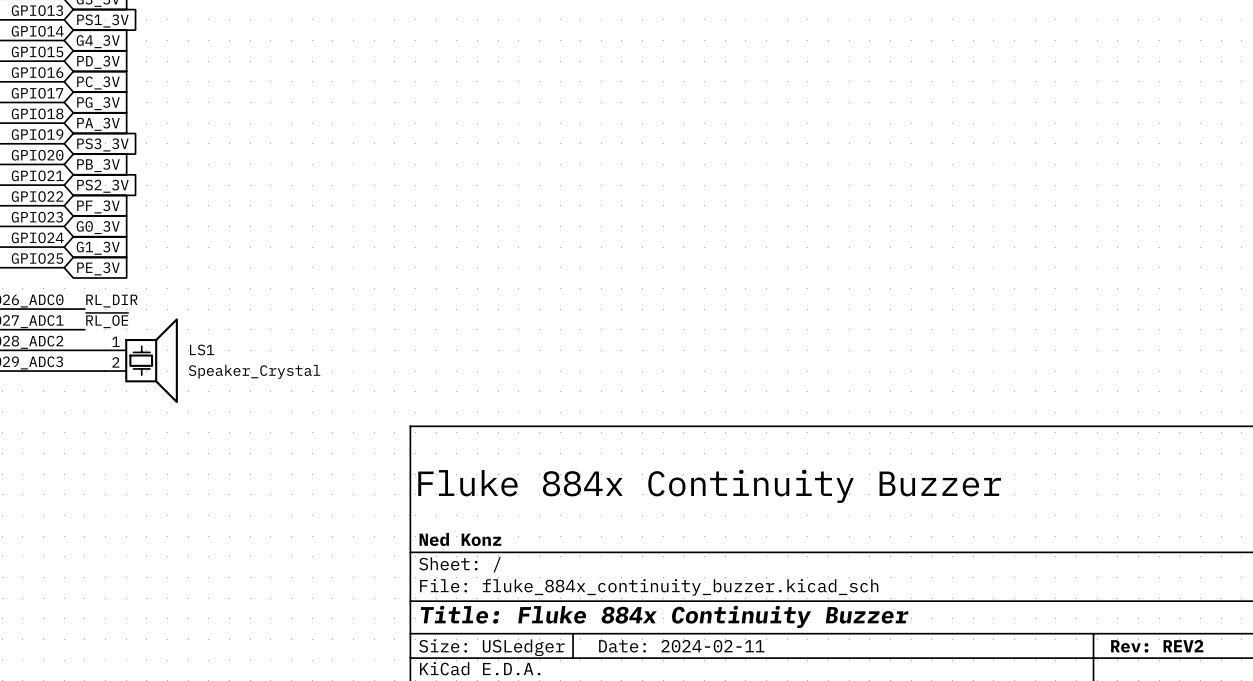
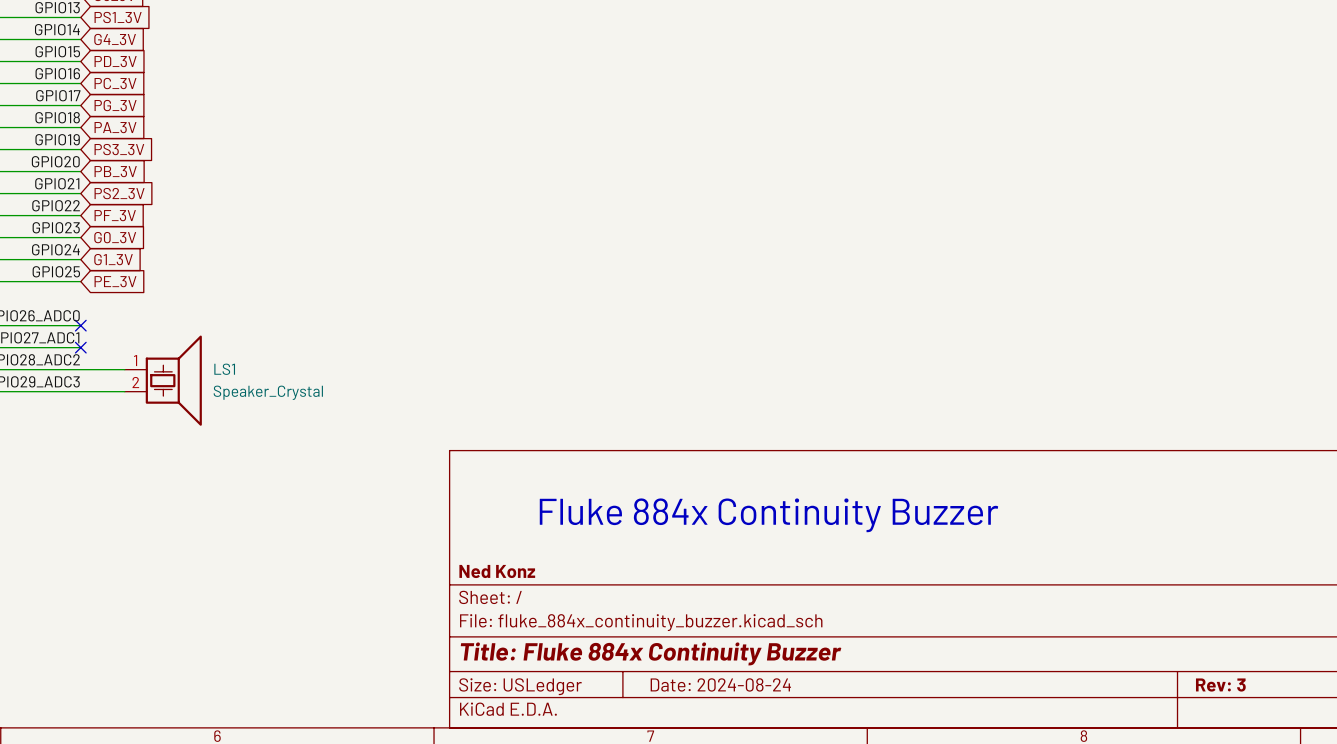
label: RL_DIR (111, 301) -> none
wire: (64, 309) (84, 309) -> none
no-connect mark: none -> (80, 325)
label: ~{RL_OE} (107, 320) -> none
wire: (64, 329) (84, 329) -> none
no-connect mark: none -> (80, 347)
title block: Date: 2024-02-11 (681, 646) -> Date: 2024-08-24 (720, 684)
title block: Rev: REV2 (1157, 646) -> Rev: 3 (1220, 685)

